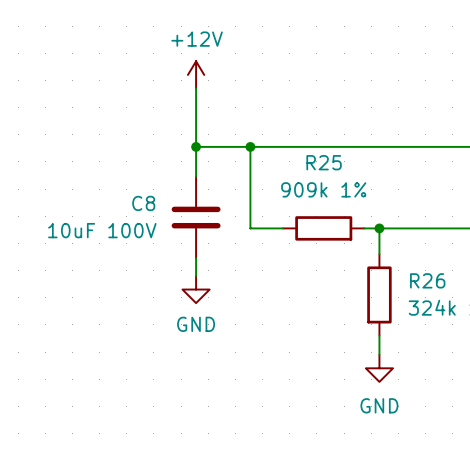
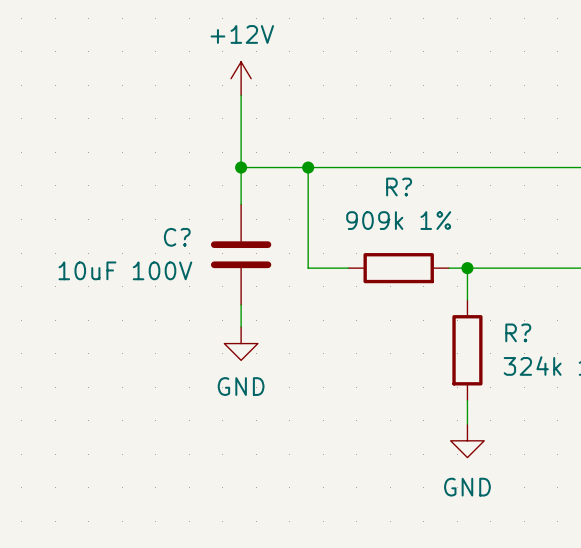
R25 name: R25 (324, 162) -> R? (399, 187)
C8 name: C8 (143, 203) -> C? (177, 237)
R26 name: R26 (427, 280) -> R? (518, 332)

